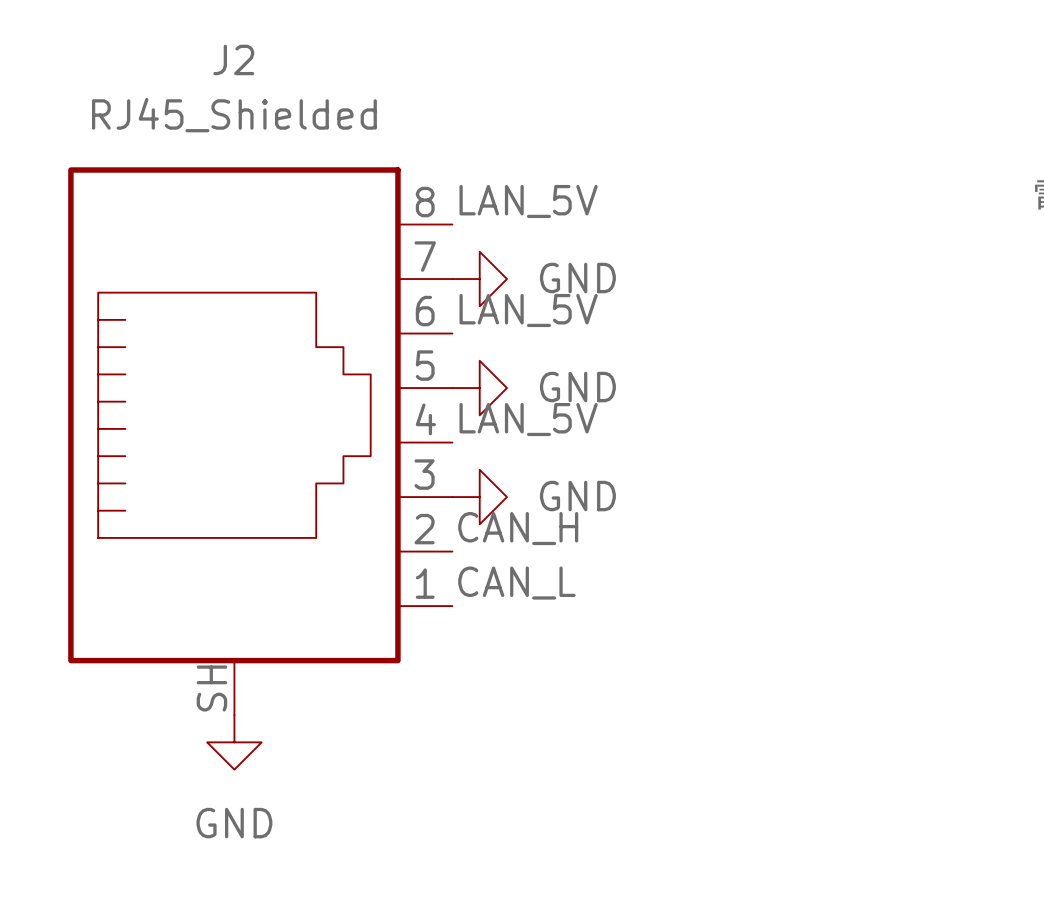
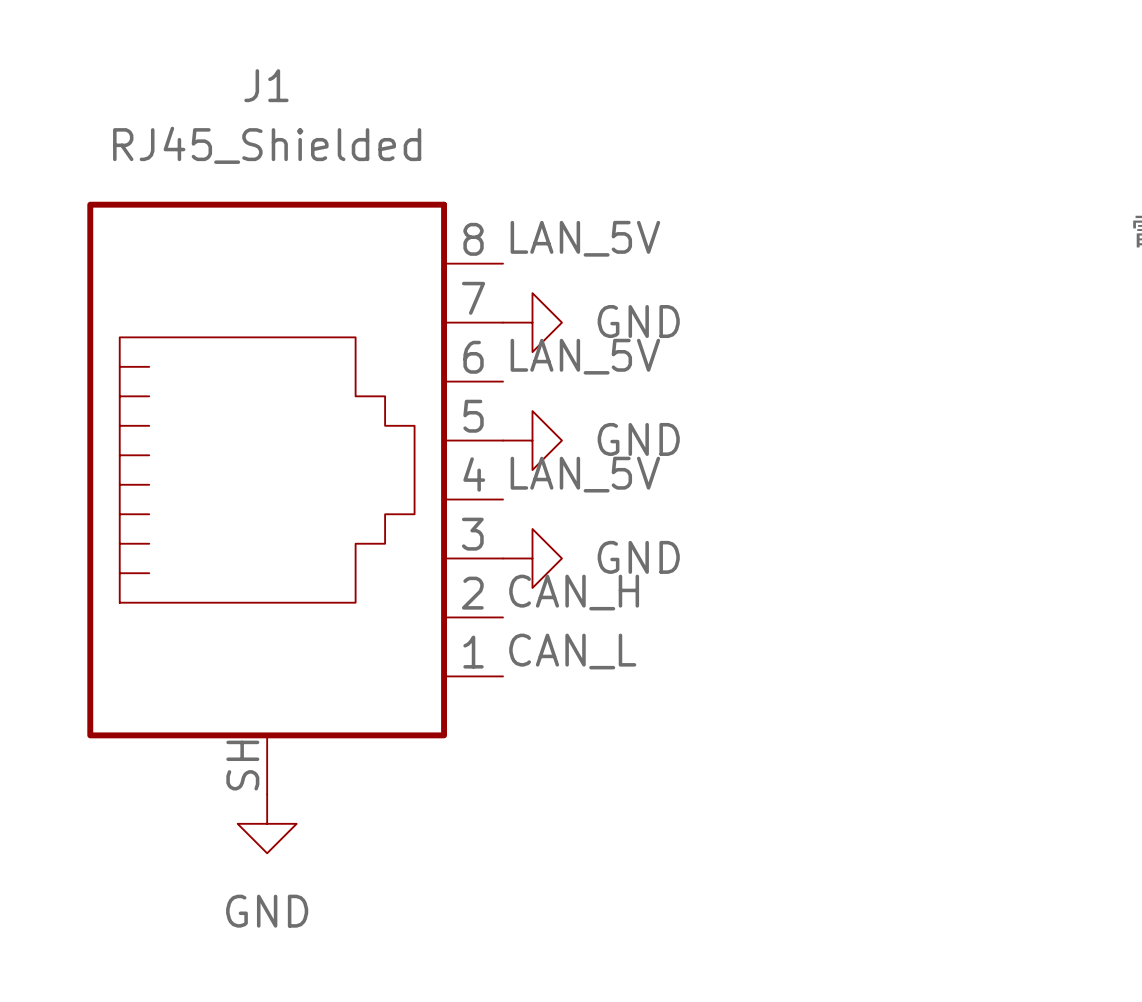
J2 name: J2 (233, 59) -> J1 (266, 85)

